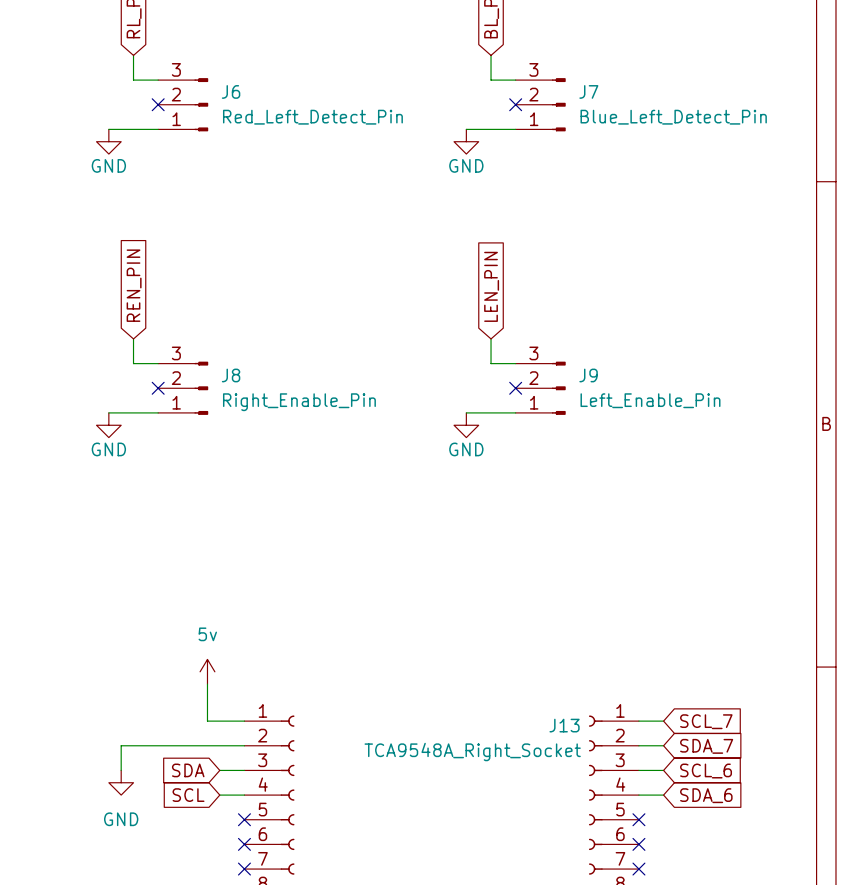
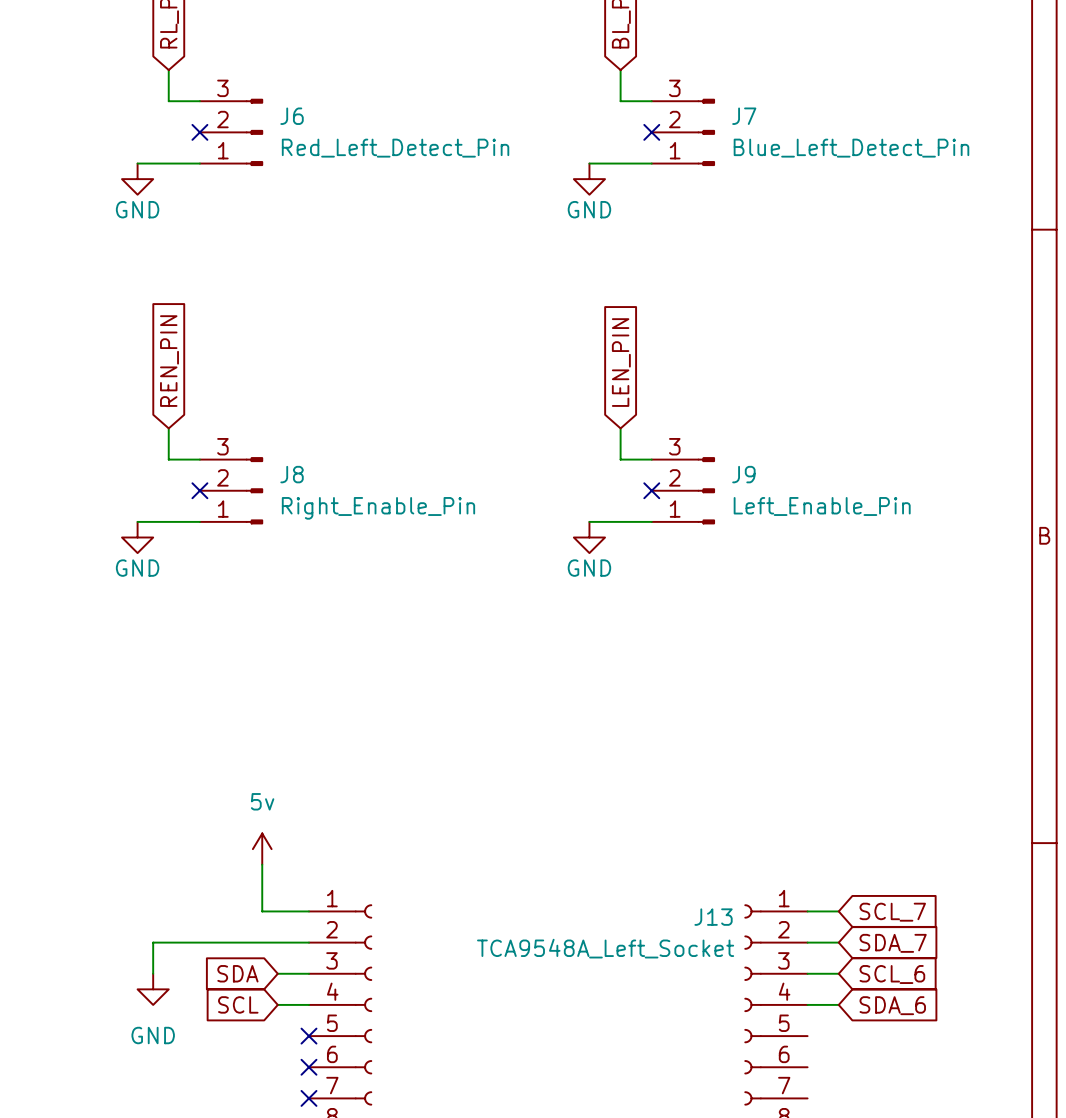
J13 value: TCA9548A_Right_Socket (472, 752) -> TCA9548A_Left_Socket (605, 948)
no-connect mark: (638, 819) -> none
no-connect mark: (638, 844) -> none
no-connect mark: (638, 869) -> none

